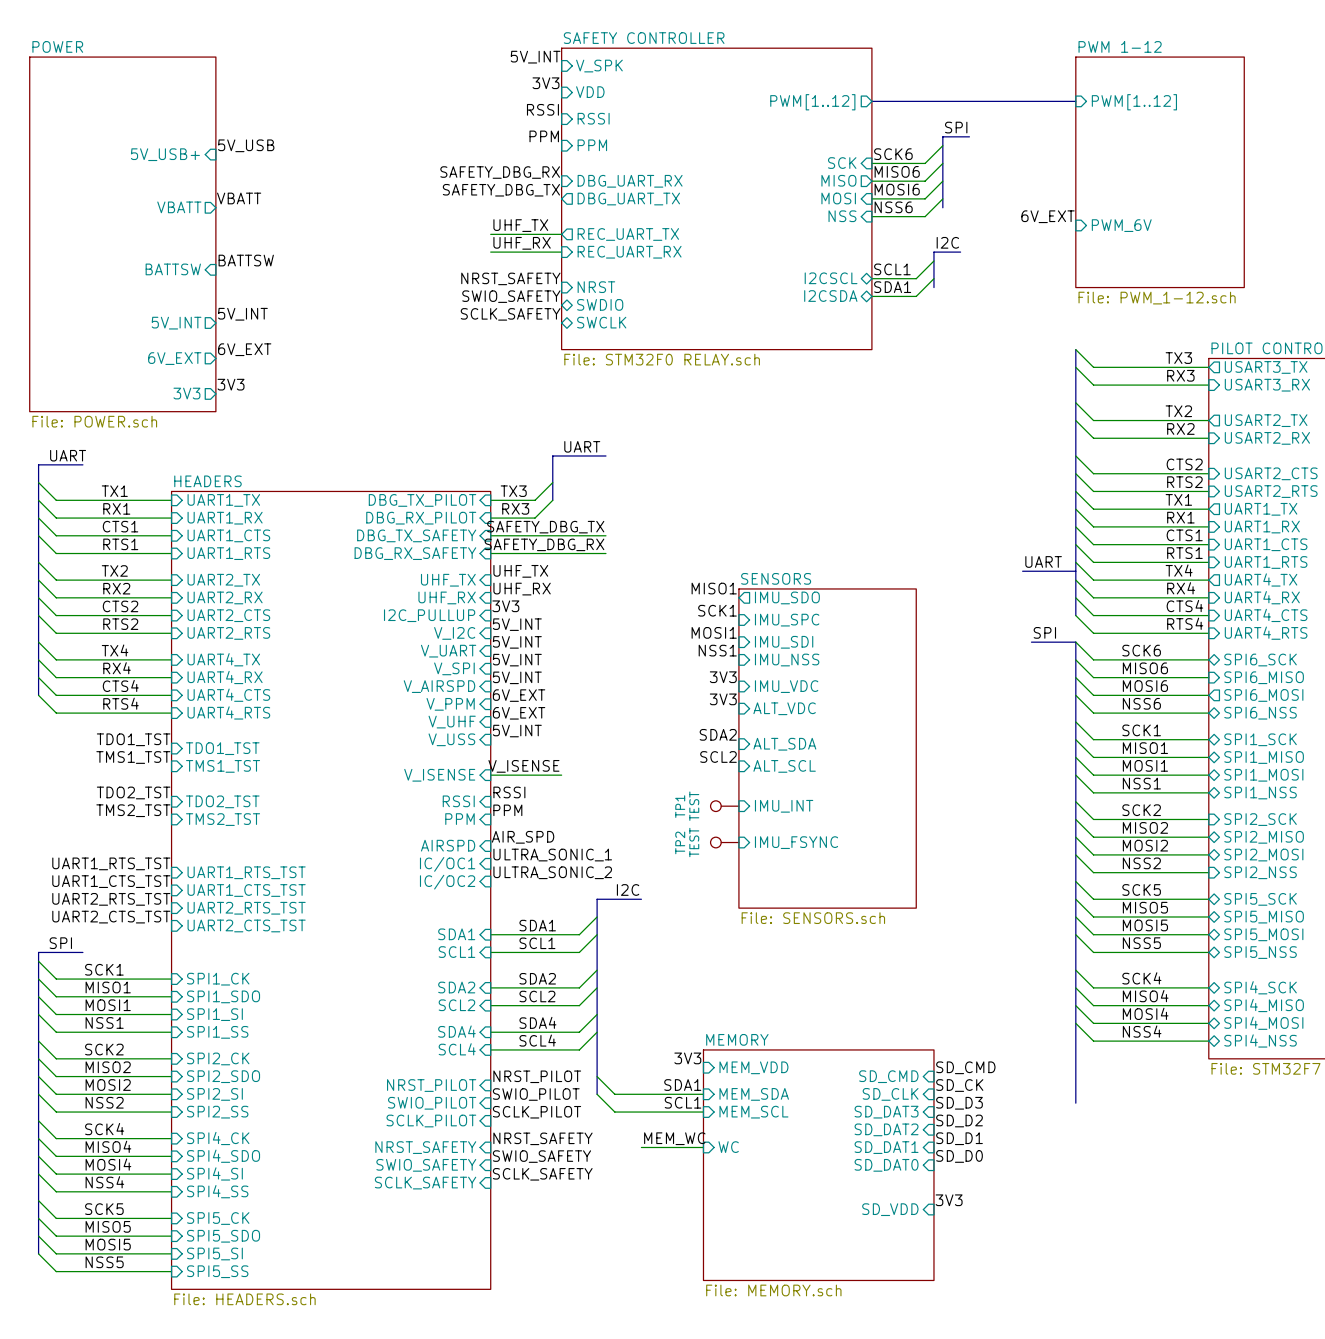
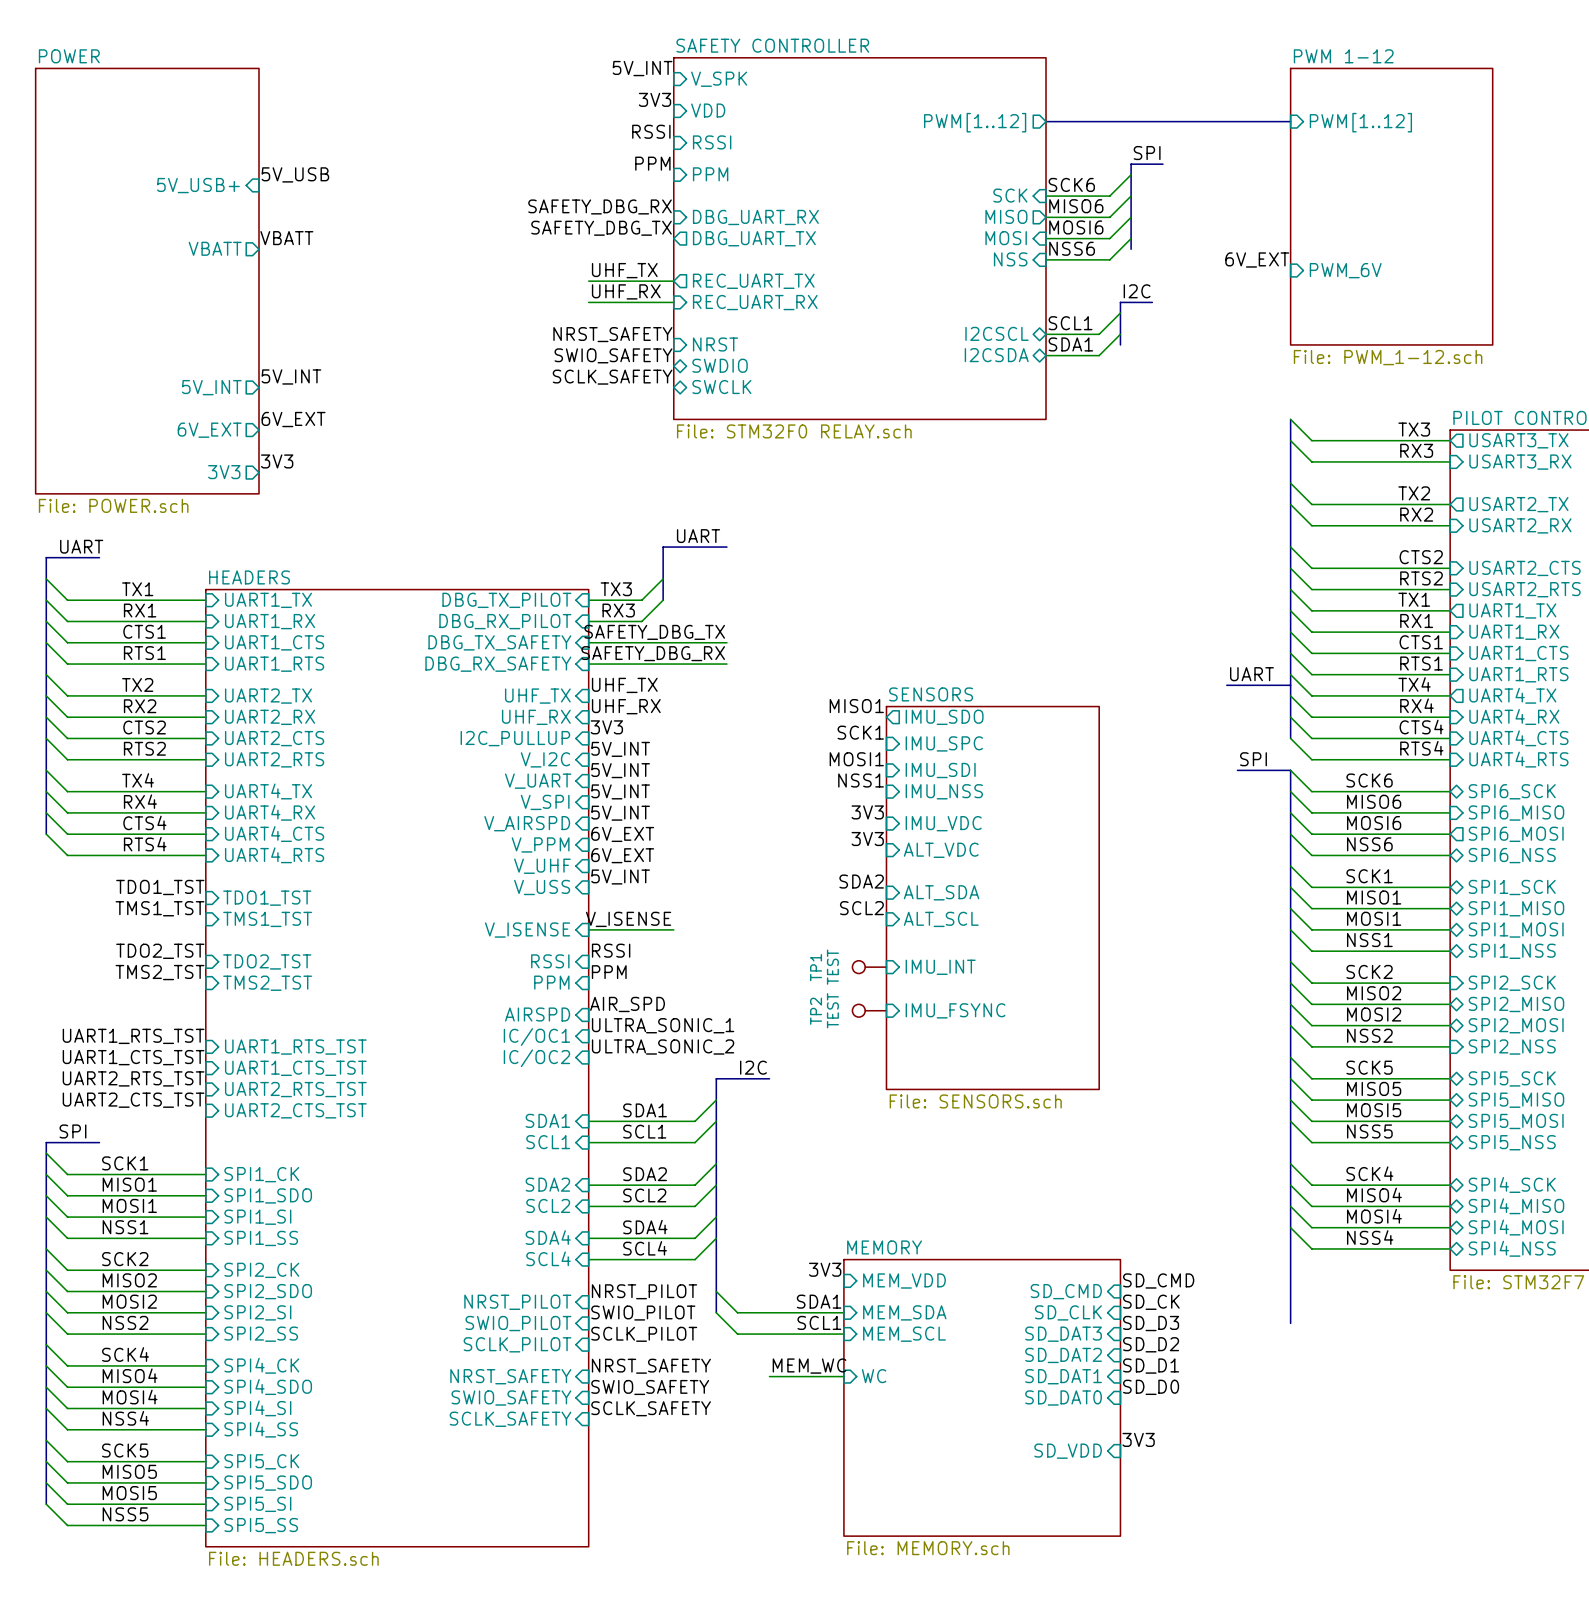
label: BATTSW (246, 260) -> none
sheet pin: BATTSW (173, 269) -> none

